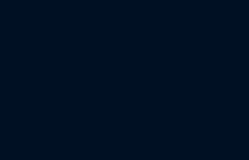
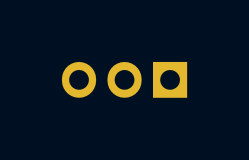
part: none -> (124, 79)

